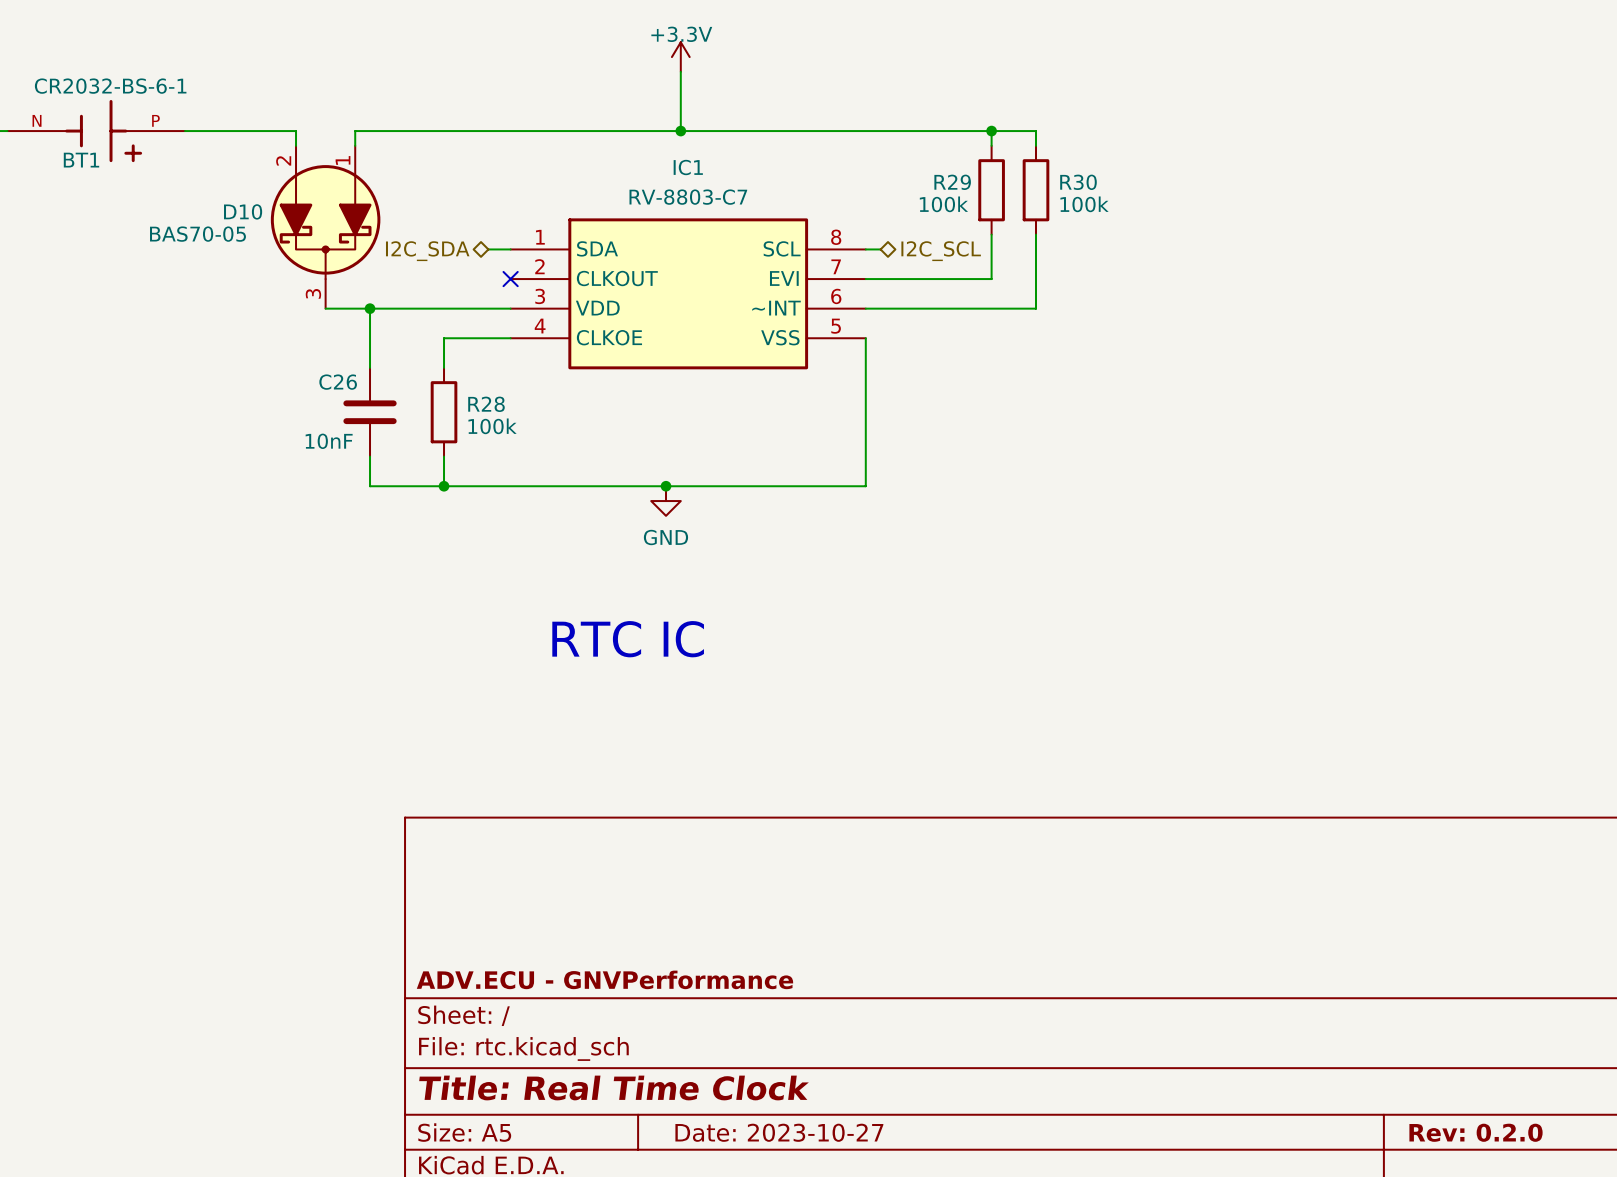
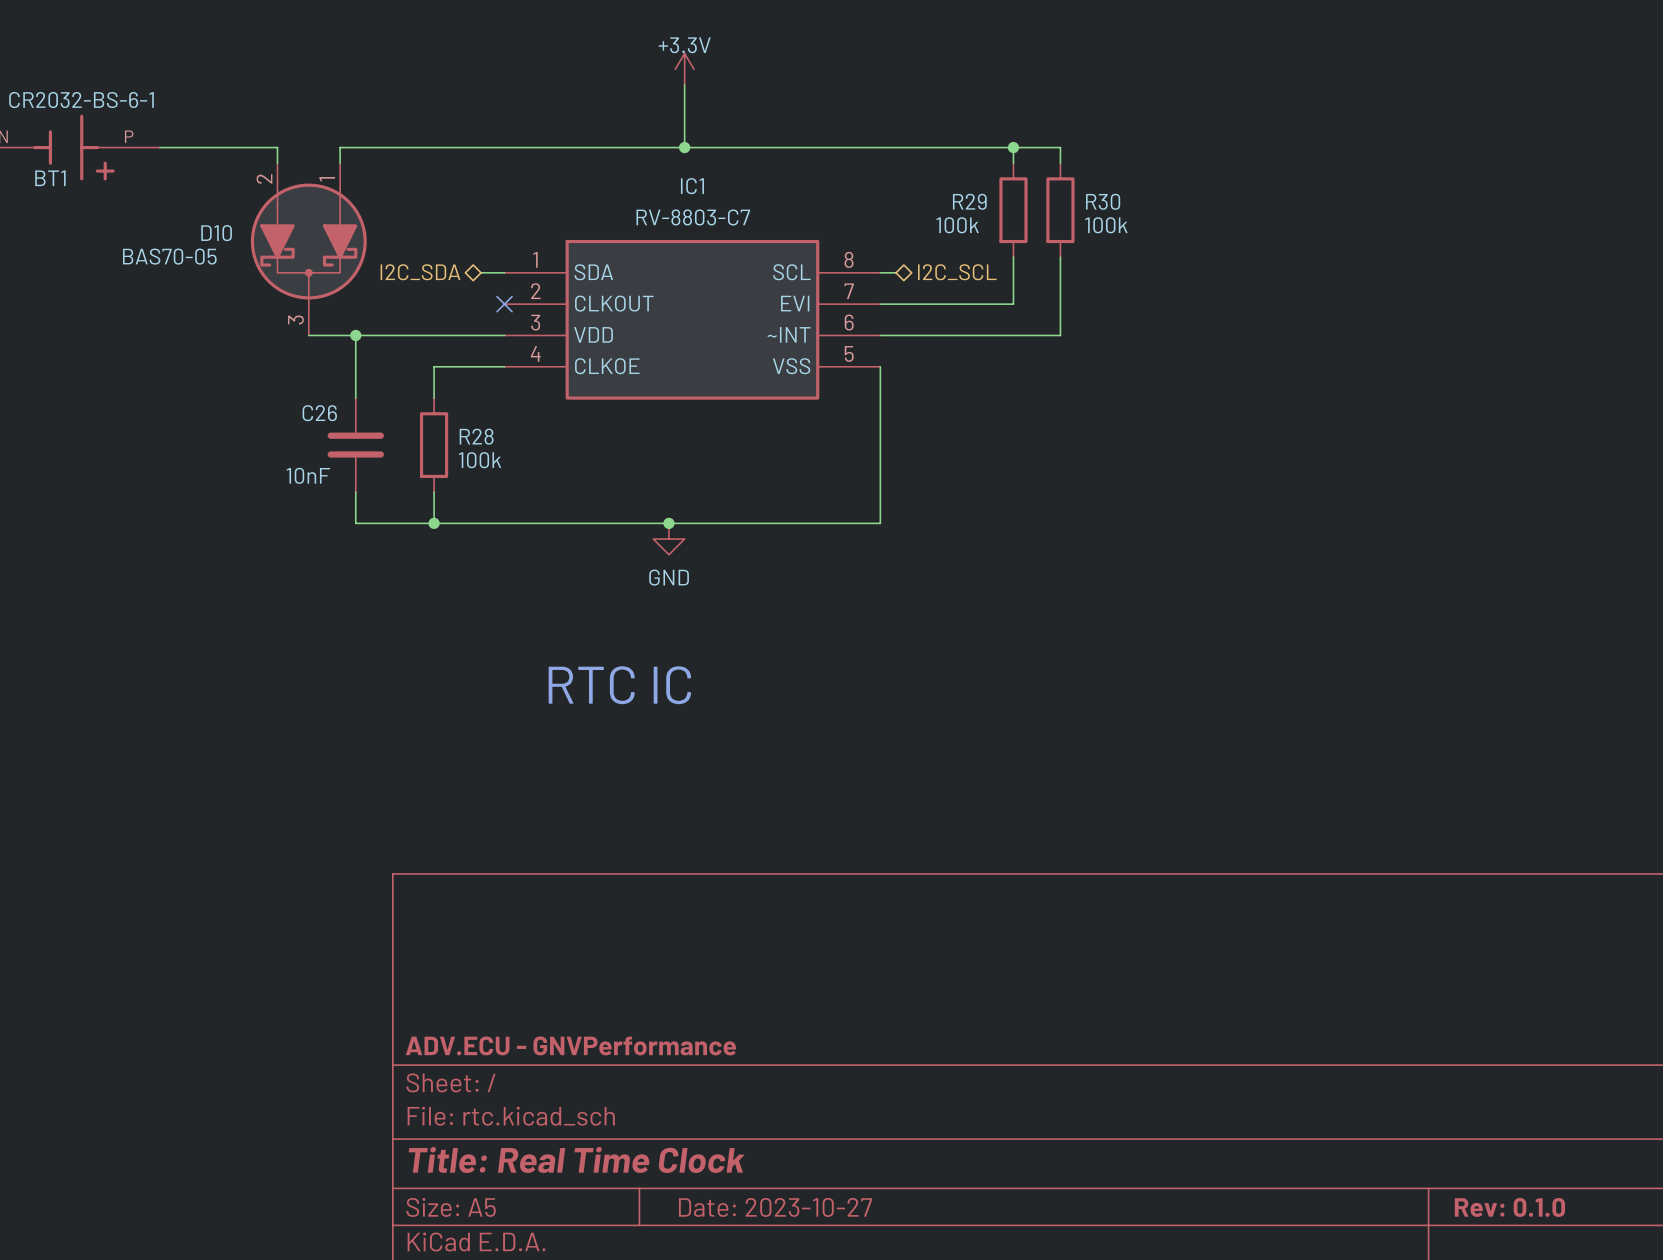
title block: Rev: 0.2.0 (1476, 1132) -> Rev: 0.1.0 (1509, 1207)

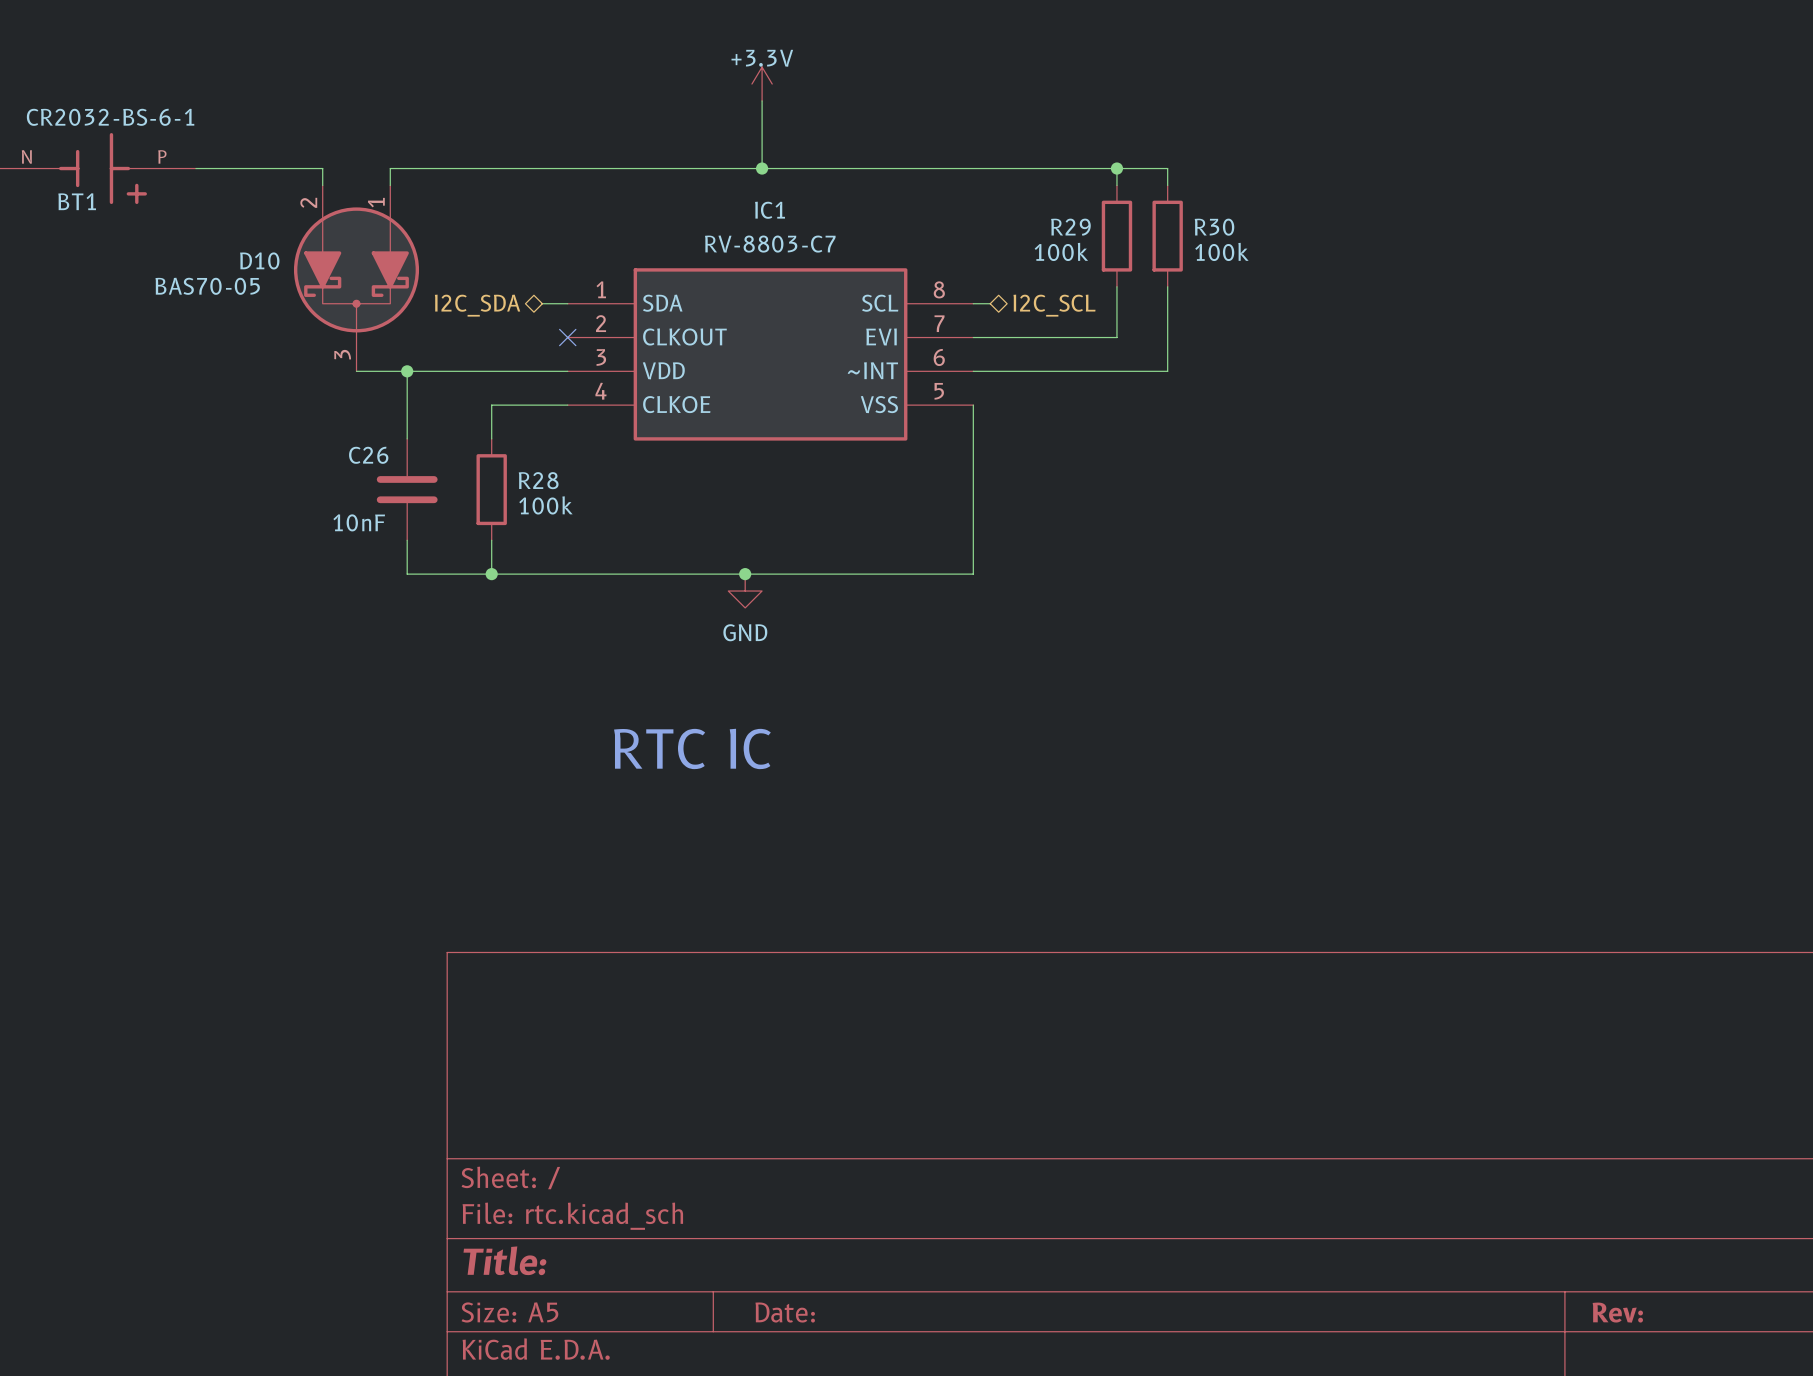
title block: ADV.ECU - GNVPerformance (570, 1045) -> none
title block: Title: Real Time Clock (576, 1159) -> Title: (504, 1260)
title block: Date: 2023-10-27 (775, 1207) -> Date: (785, 1312)
title block: Rev: 0.1.0 (1509, 1207) -> Rev: (1617, 1312)

